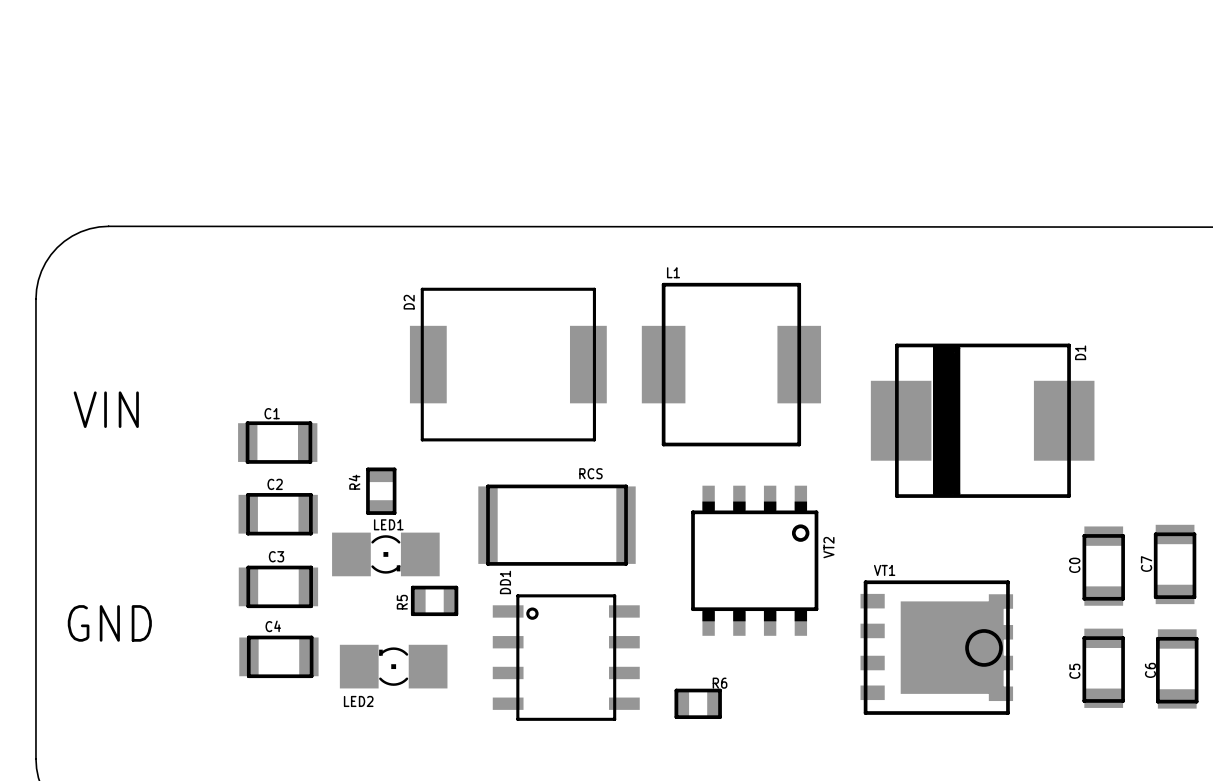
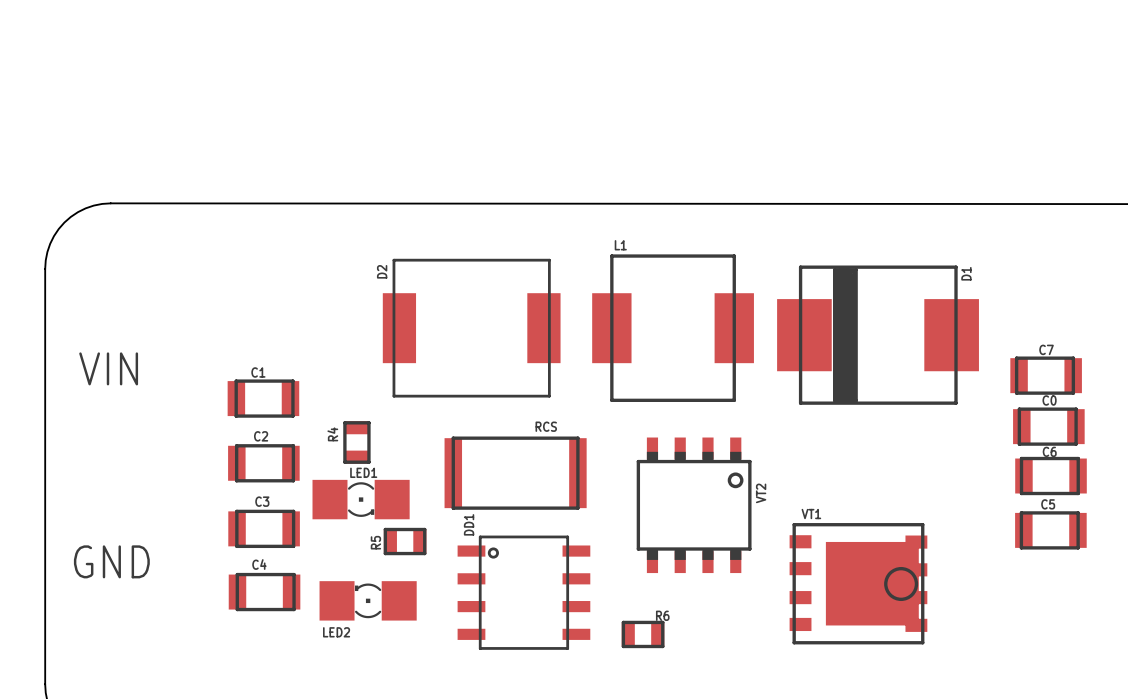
D1 position: (982, 420) -> (878, 335)
C7 rotation: 0° (1175, 564) -> 90° clockwise (1046, 375)
C7 position: (1175, 564) -> (1046, 375)
C0 rotation: 0° (1103, 566) -> 90° clockwise (1048, 426)
C0 position: (1103, 566) -> (1048, 426)
C5 rotation: 0° (1103, 668) -> 90° clockwise (1050, 530)
C5 position: (1103, 668) -> (1050, 530)
C6 rotation: 0° (1177, 668) -> 90° clockwise (1051, 476)
C6 position: (1177, 668) -> (1051, 476)

